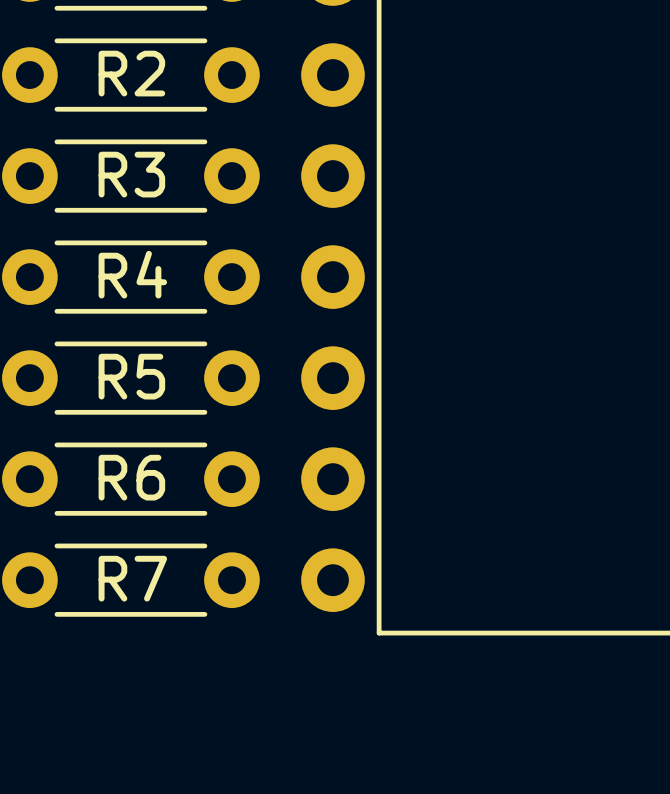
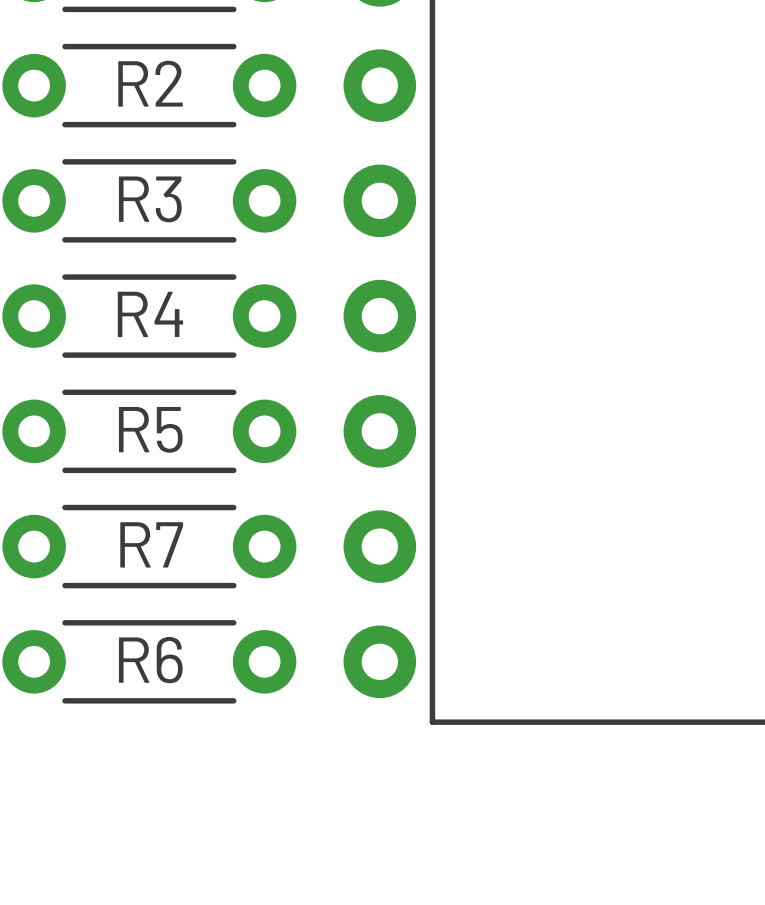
R6 name: R6 (131, 477) -> R7 (151, 544)
R7 name: R7 (132, 578) -> R6 (150, 660)

